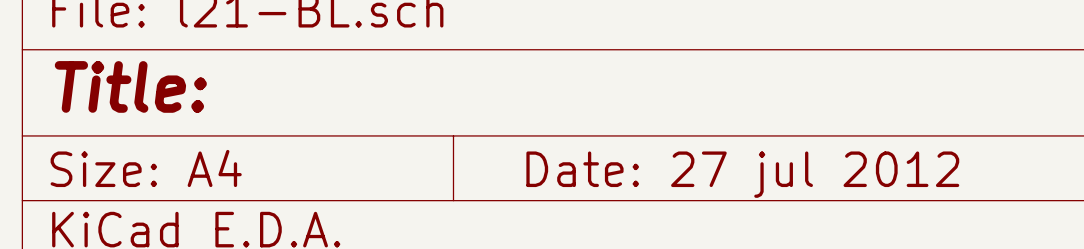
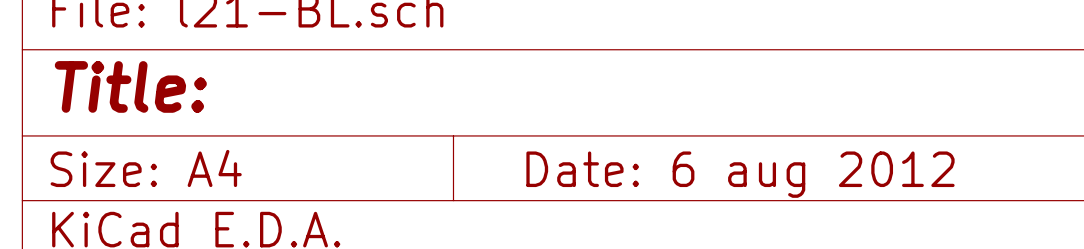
title block: Date: 27 jul 2012 (742, 174) -> Date: 6 aug 2012 (740, 174)

